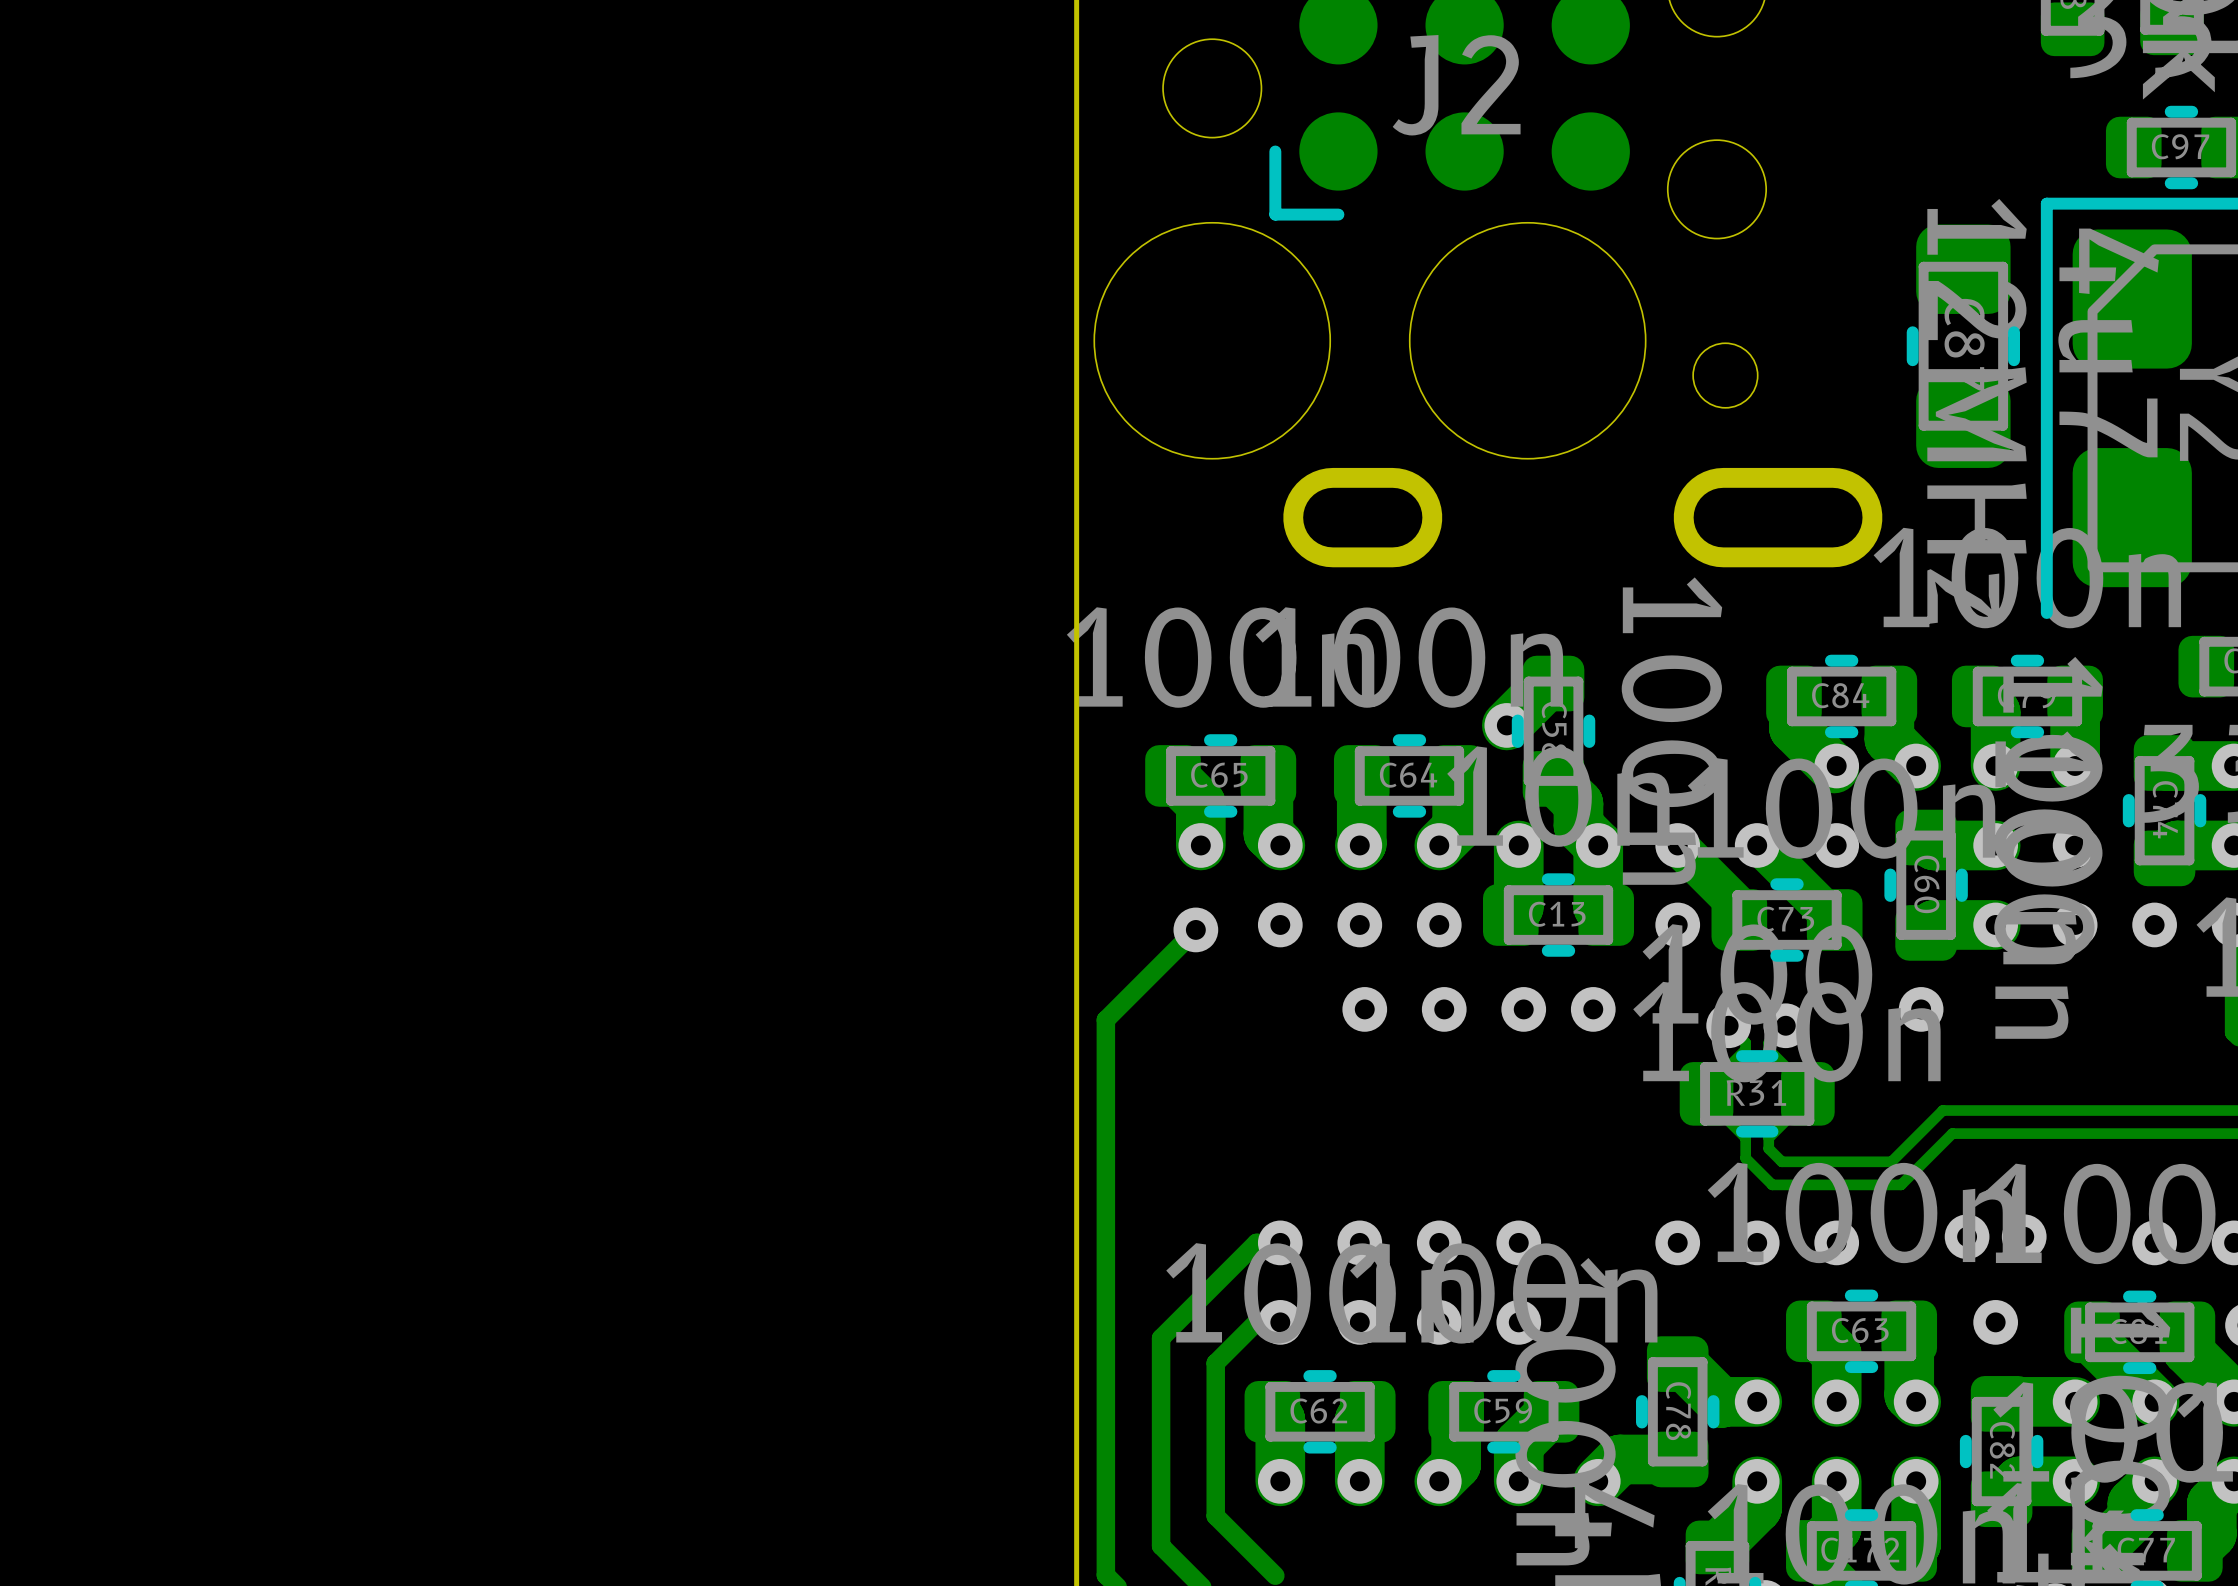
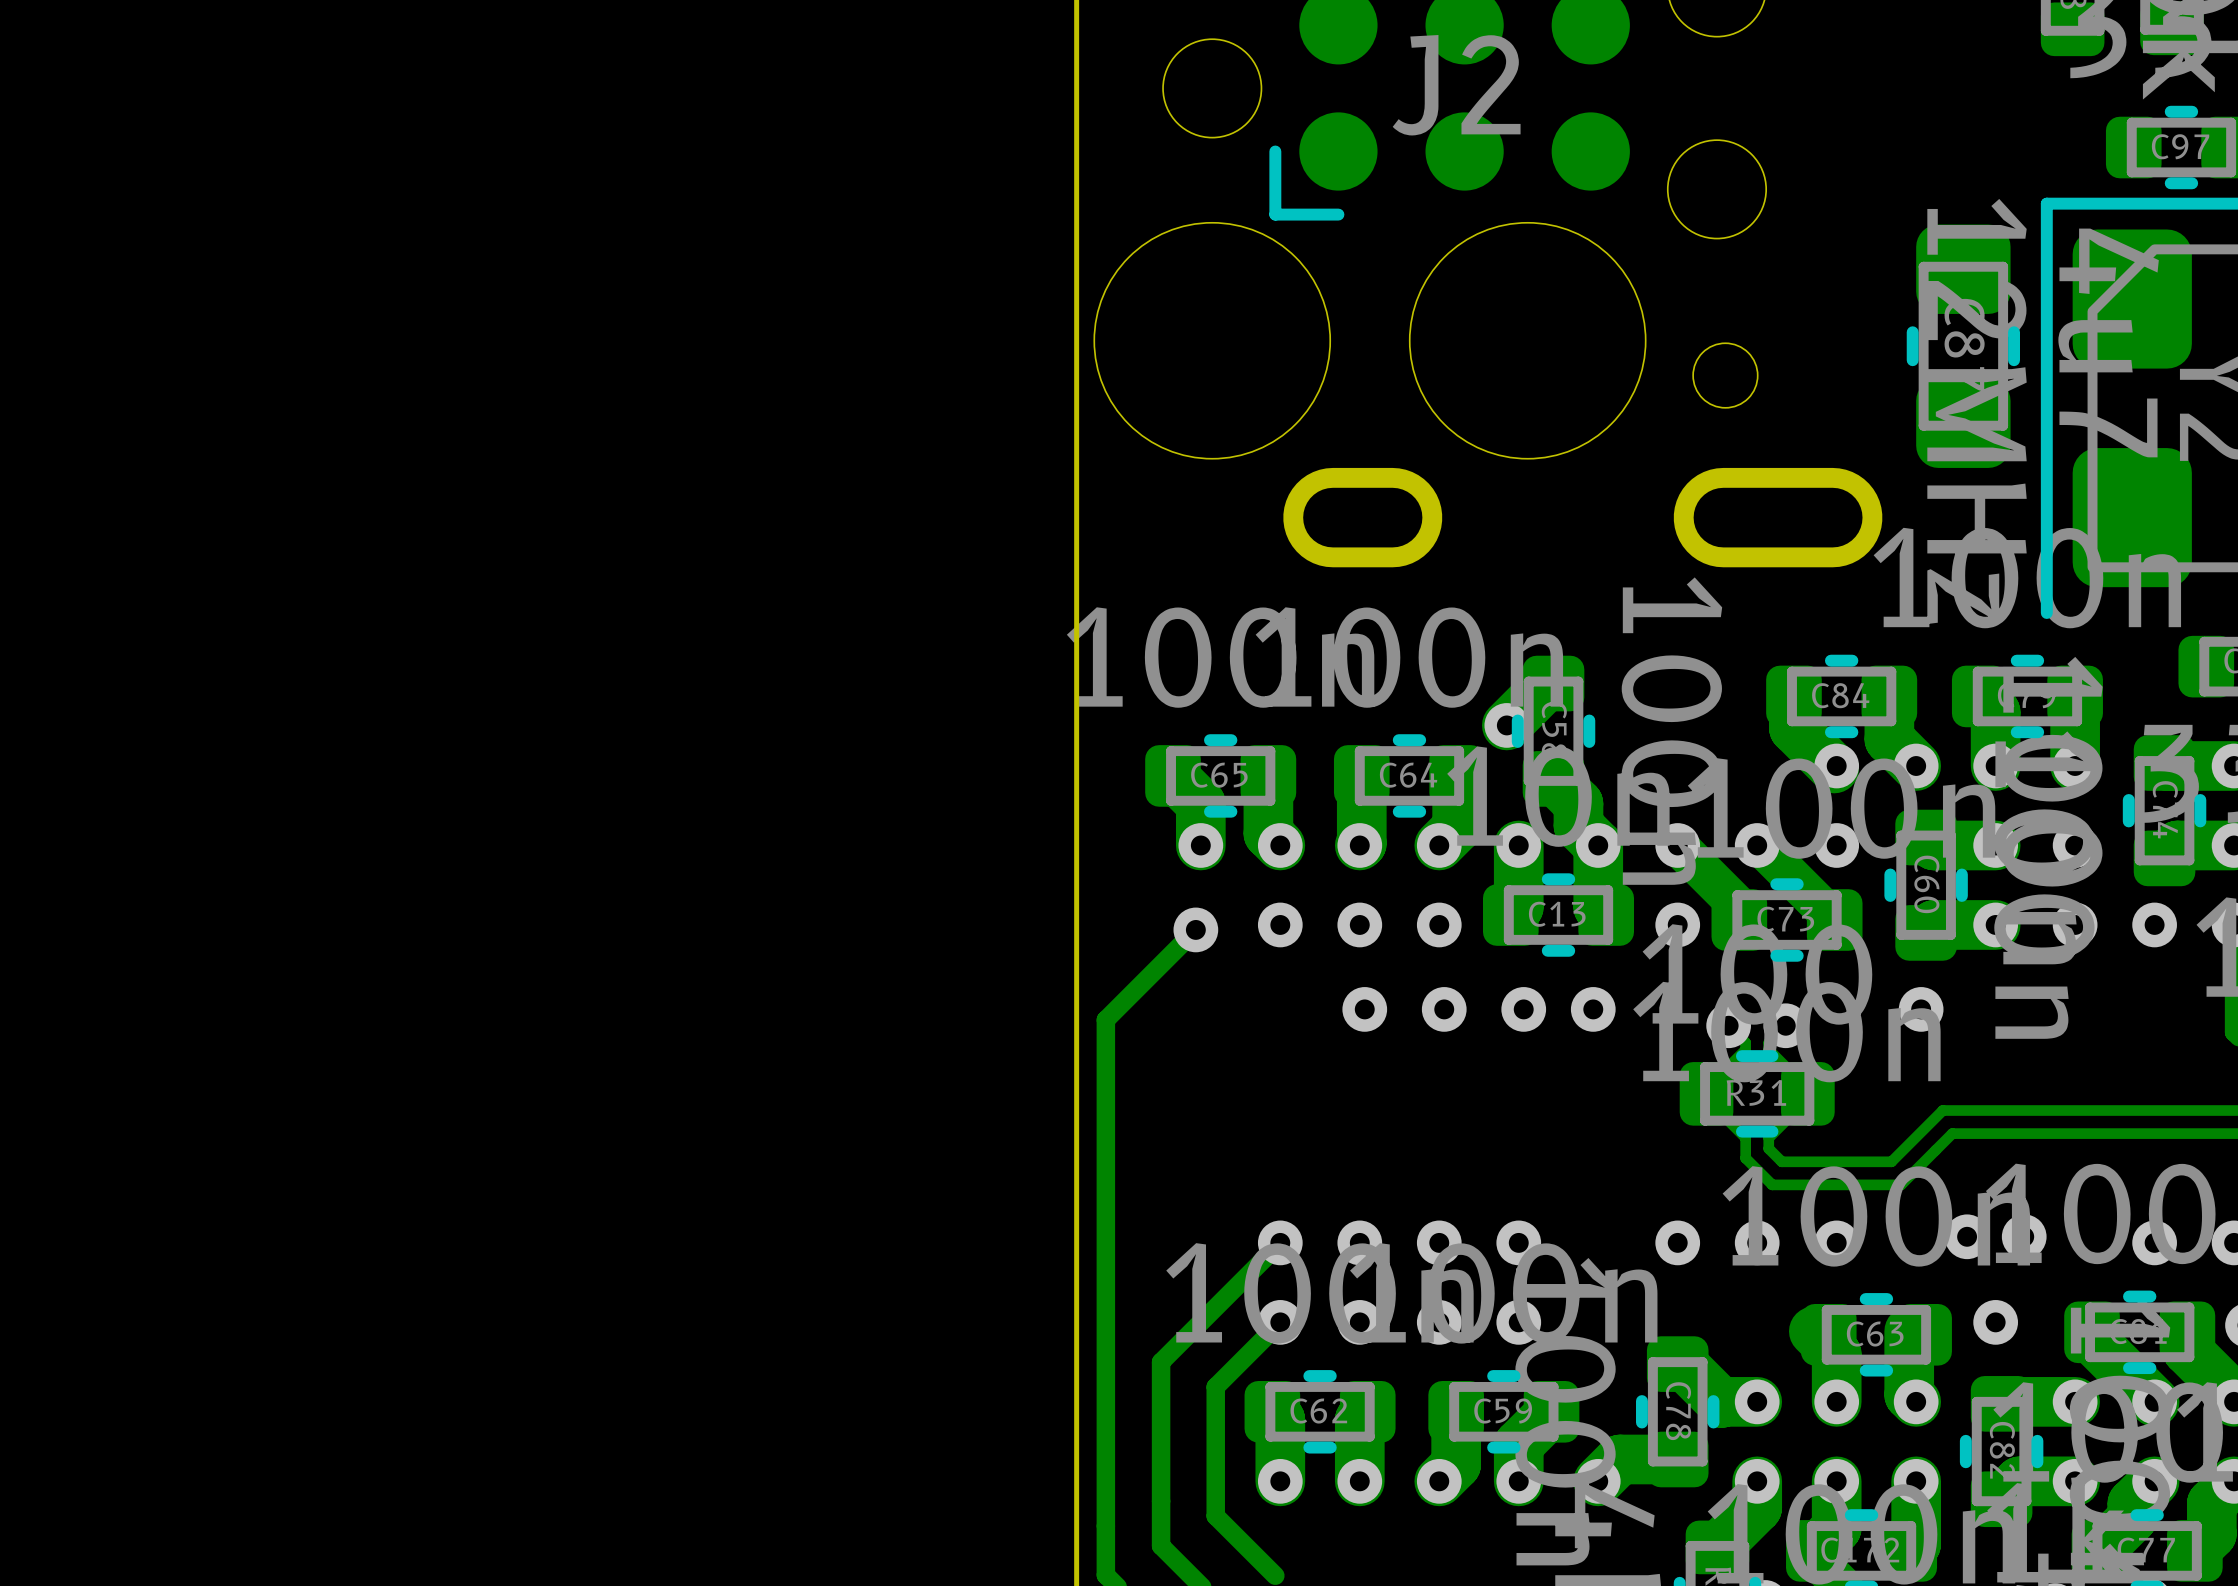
track: (1280, 1242) (1256, 1242) (1161, 1338) (1161, 1362) -> (1280, 1242) (1161, 1362)
track: (1280, 1322) (1256, 1322) (1215, 1363) (1215, 1386) -> (1280, 1322) (1215, 1386)
C63 position: (1861, 1331) -> (1876, 1334)

